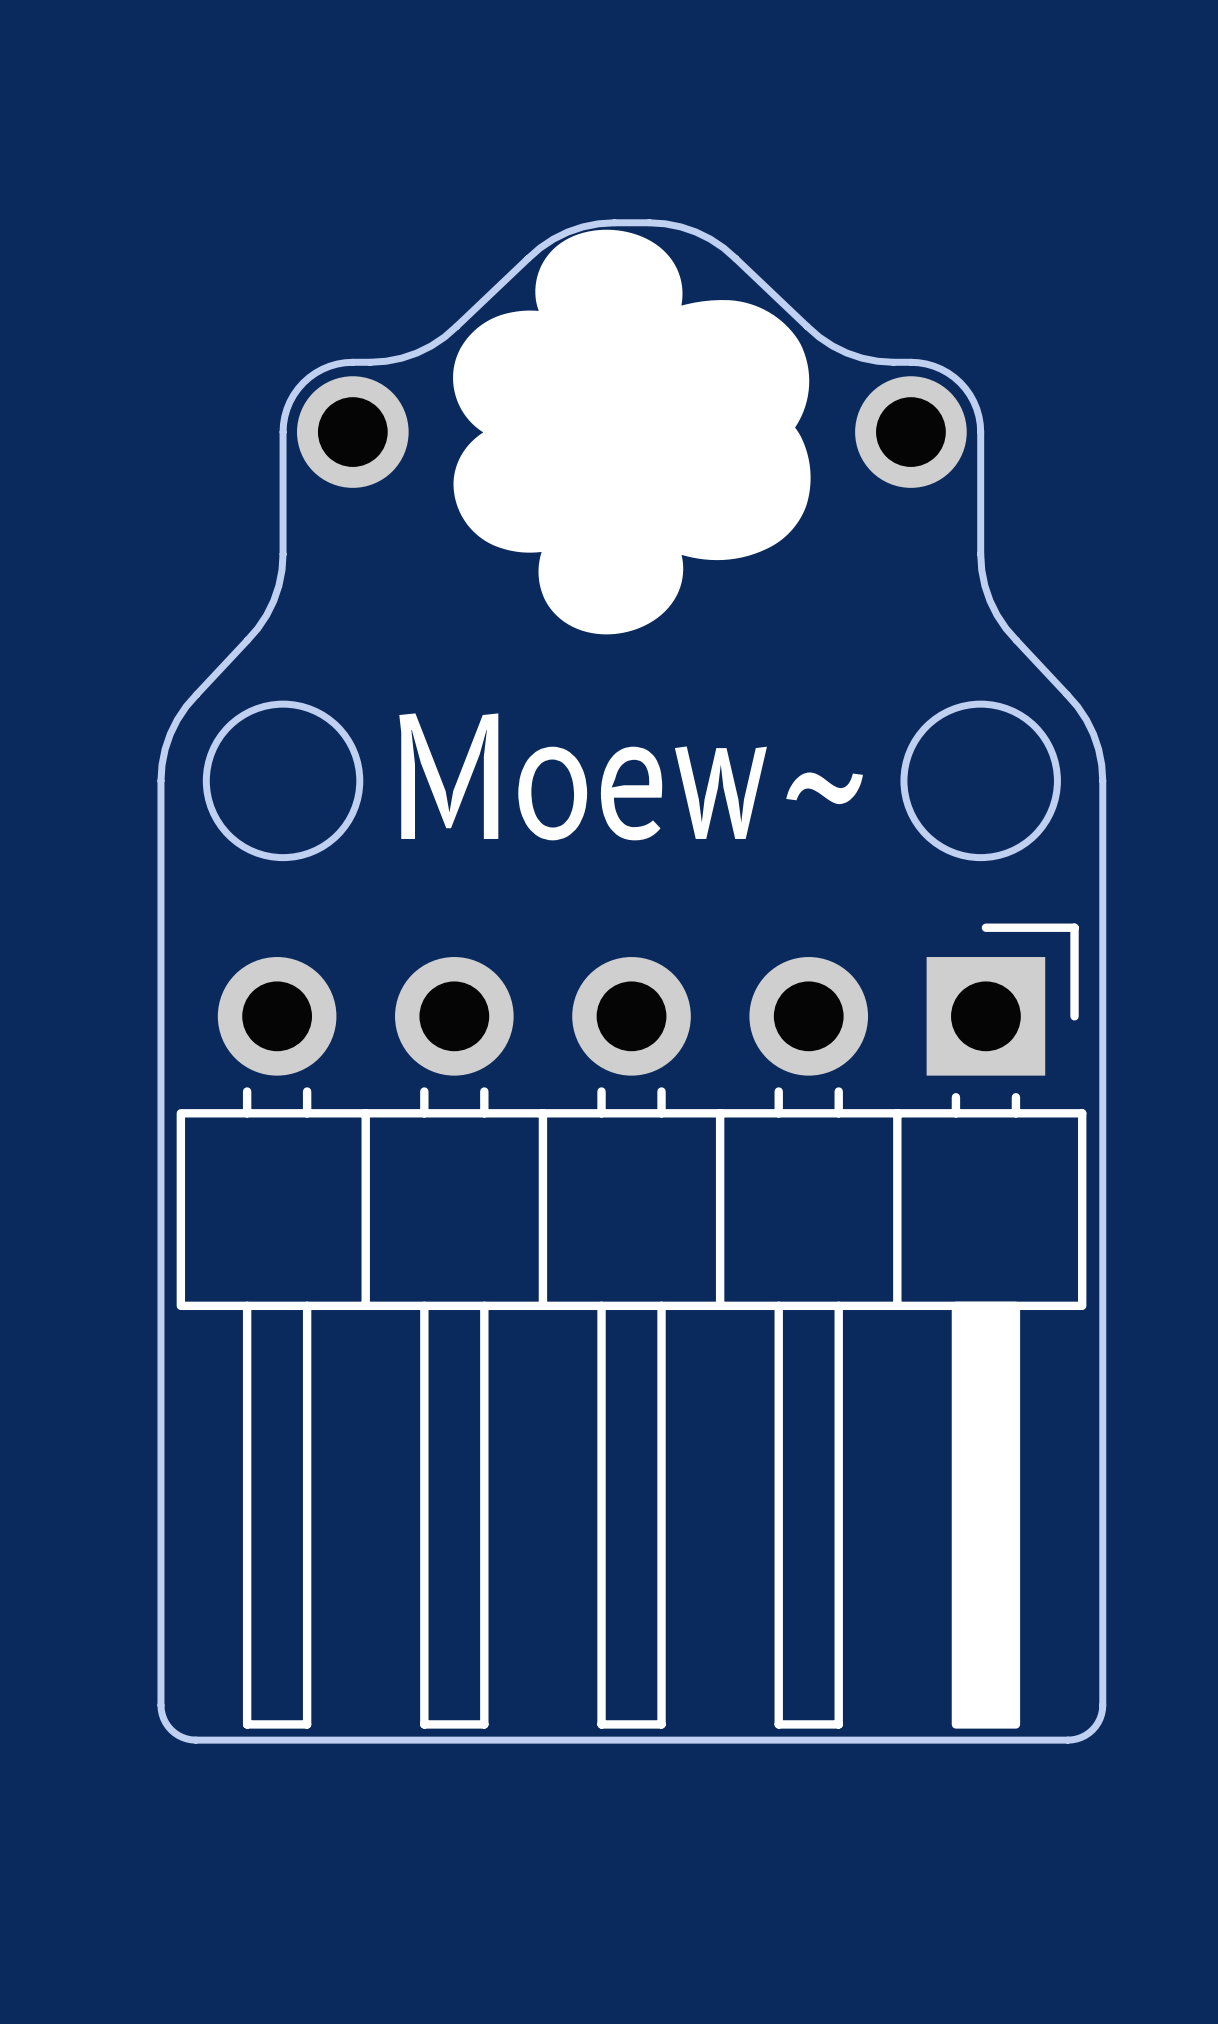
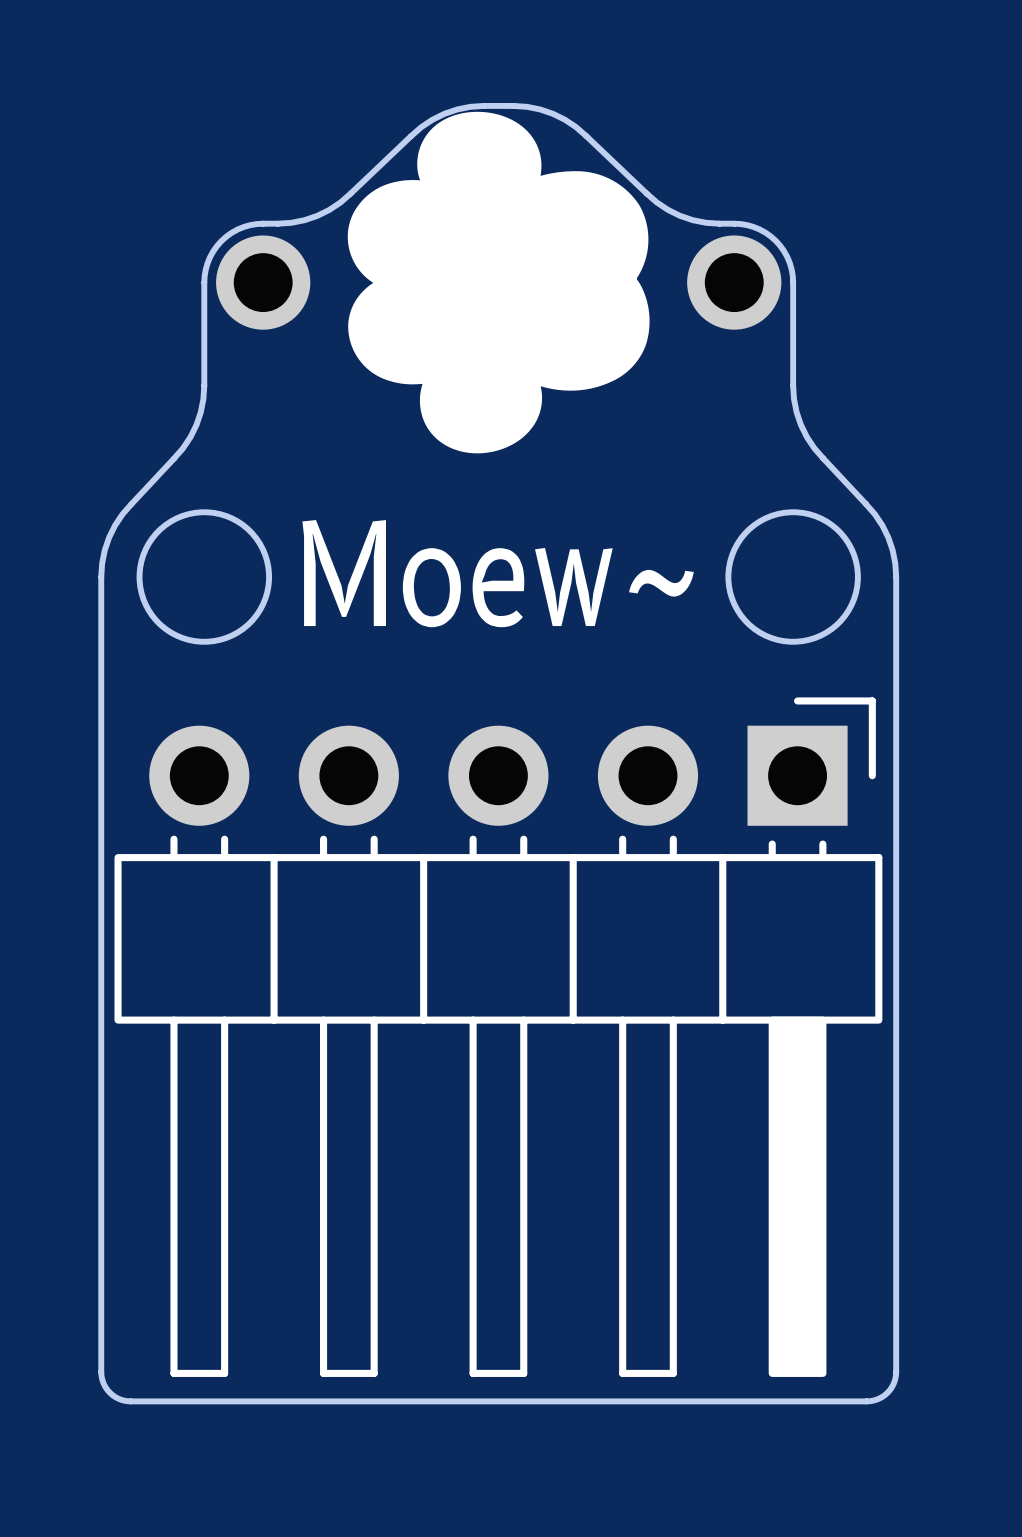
board edge: (160, 1705) (163, 1718) (171, 1729) (182, 1737) (195, 1740) (1067, 1740) (1081, 1737) (1092, 1729) (1100, 1718) (1102, 1705) -> (101, 1357) (101, 1375) (105, 1386) (115, 1397) (130, 1401) (866, 1401) (881, 1397) (892, 1386) (895, 1375) (896, 1357)

